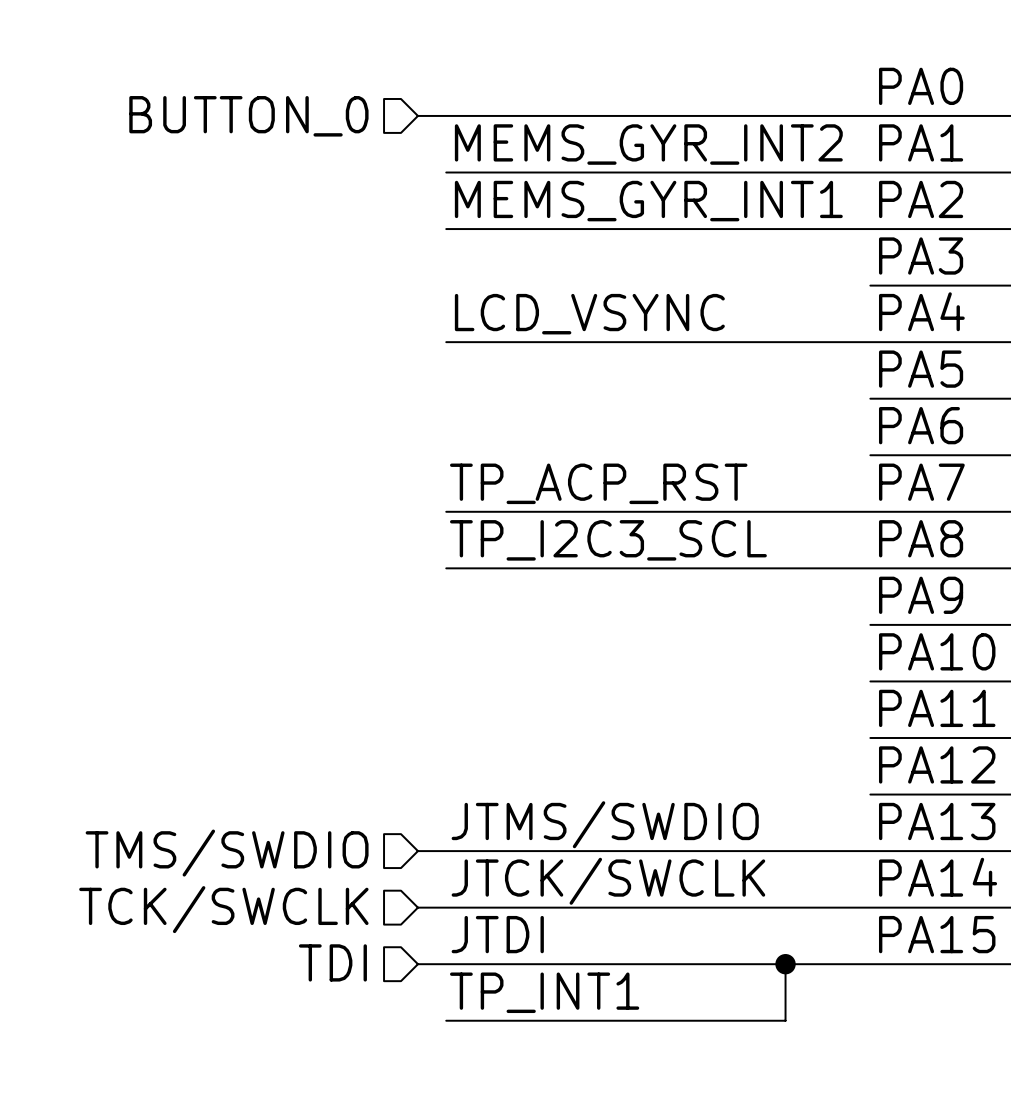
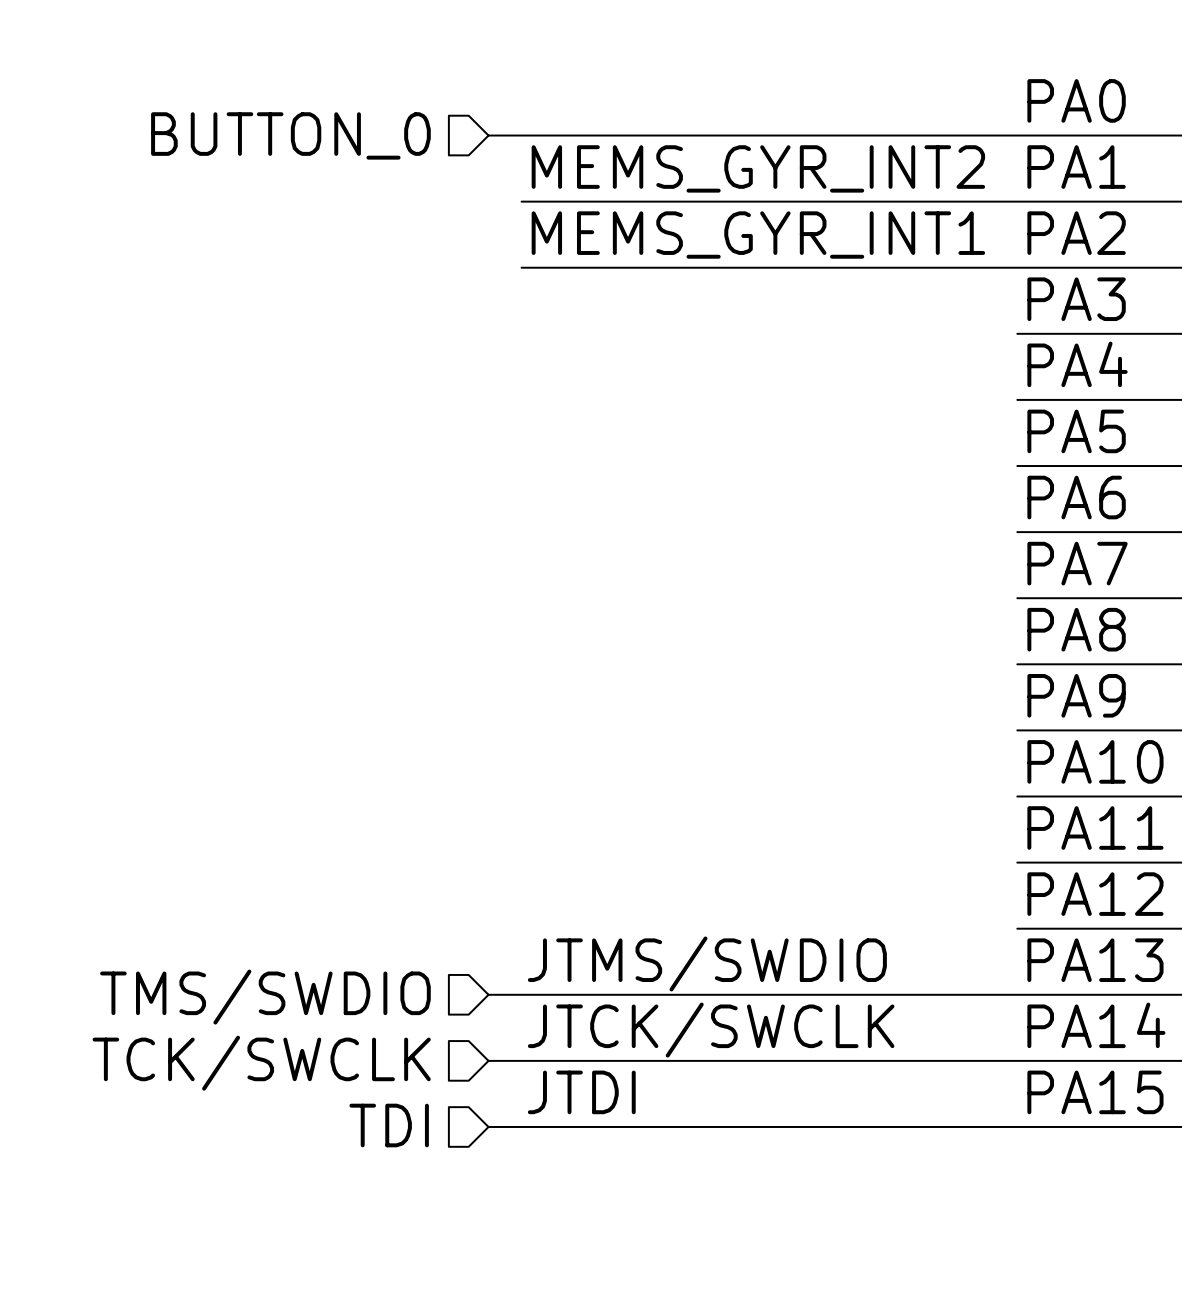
label: LCD_VSYNC (589, 314) -> none
wire: (446, 342) (870, 342) -> none
label: TP_ACP_RST (598, 483) -> none
wire: (446, 511) (870, 511) -> none
label: TP_I2C3_SCL (608, 540) -> none
wire: (446, 568) (870, 568) -> none
wire: (785, 964) (785, 1020) (446, 1020) -> none
junction: (785, 964) -> none
label: TP_INT1 (544, 992) -> none

